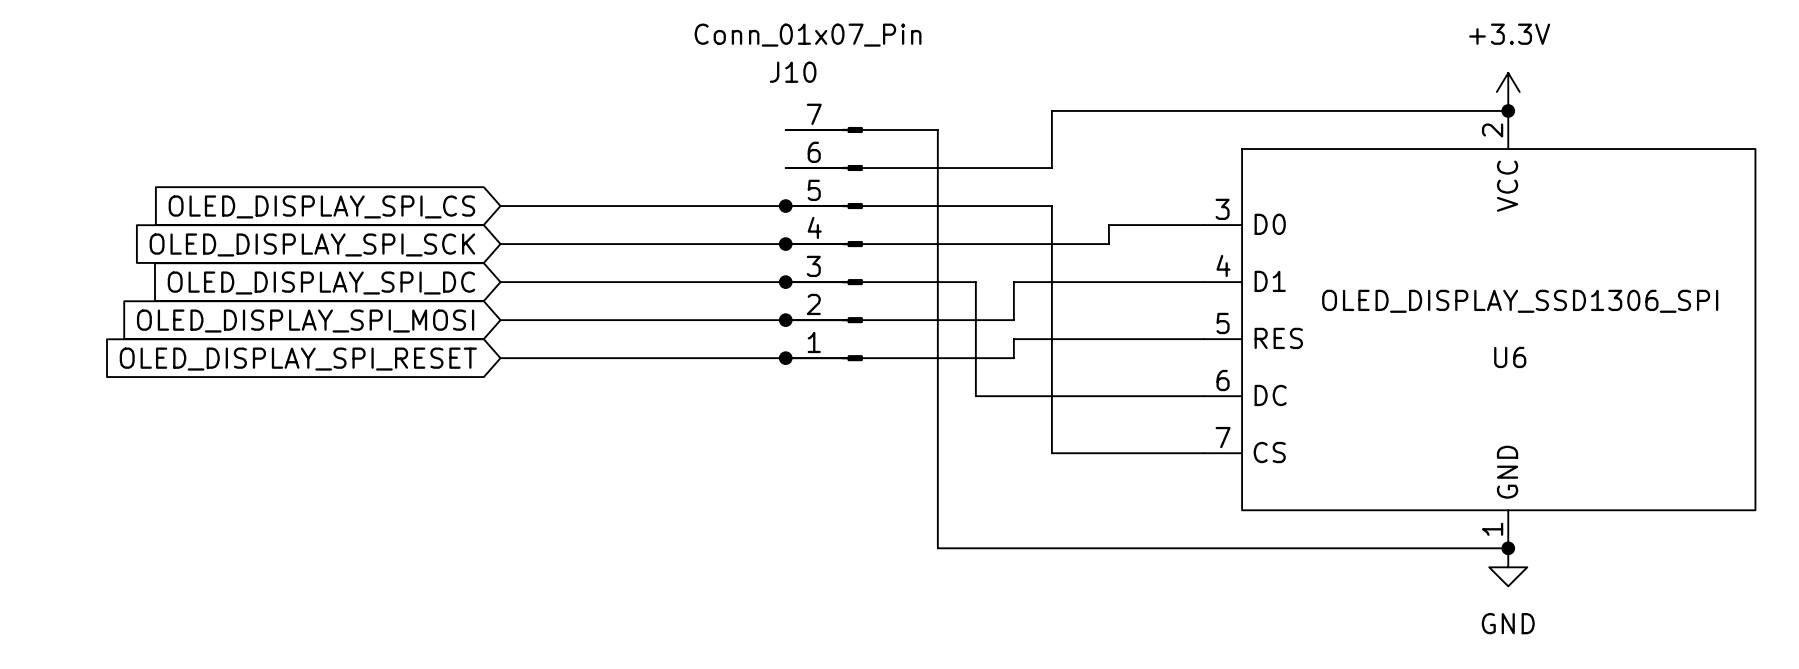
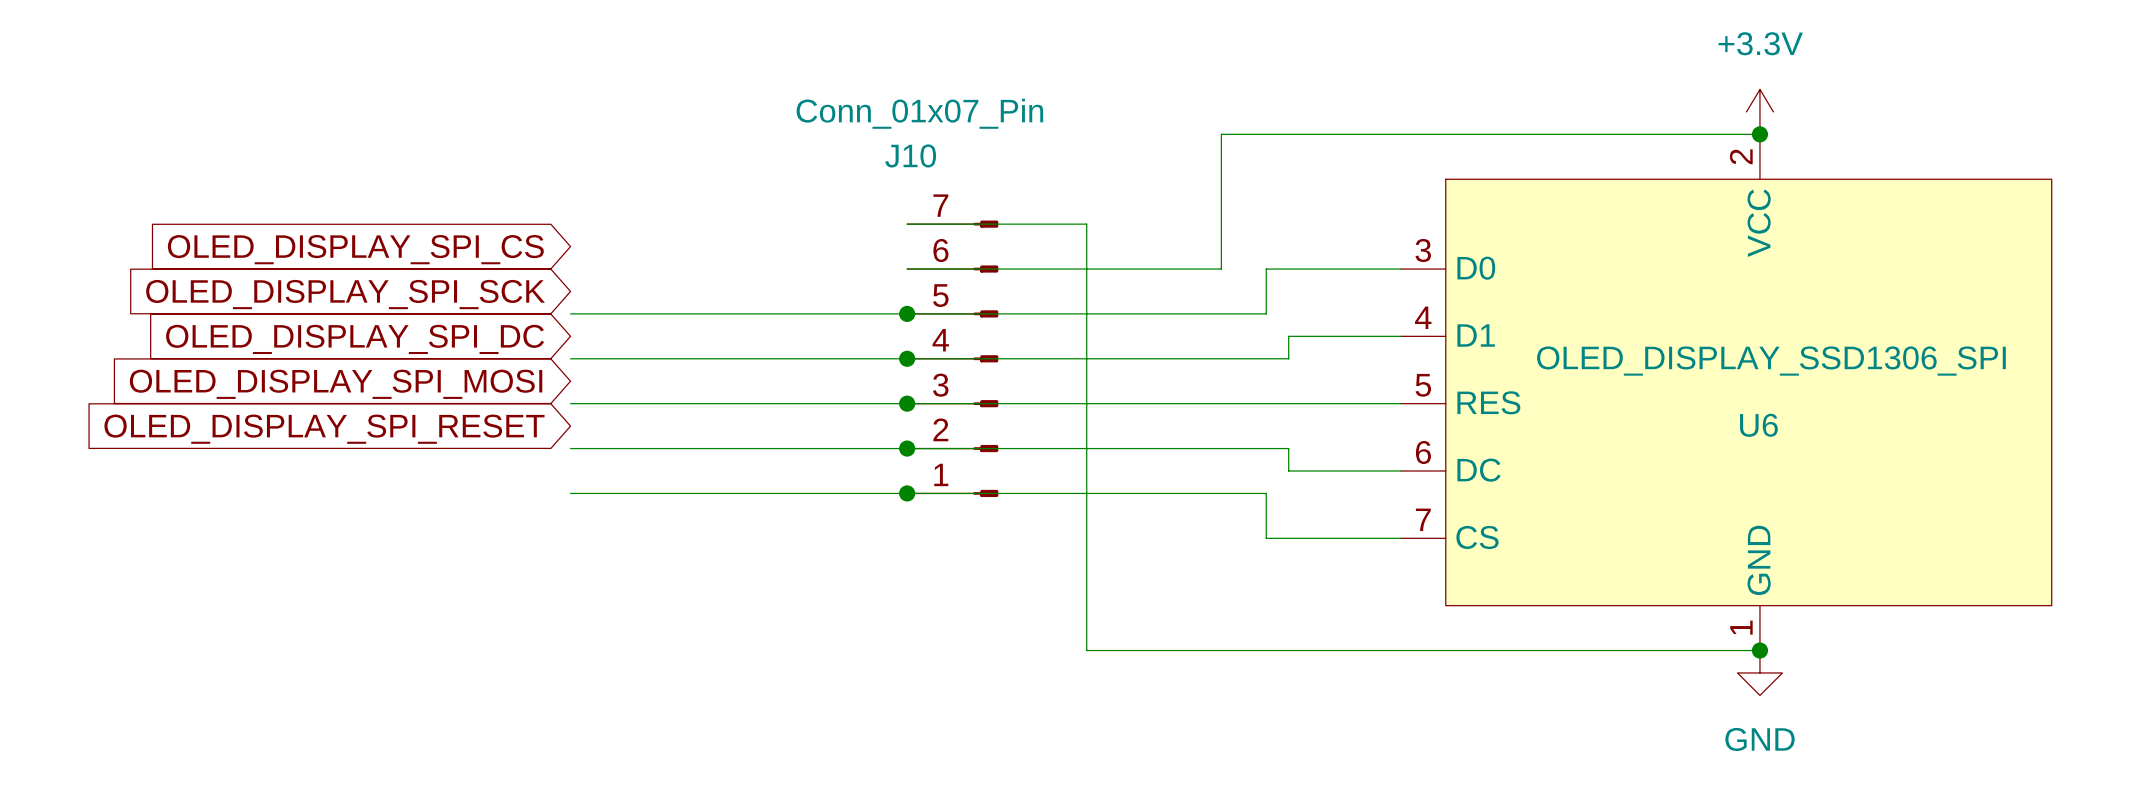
wire: (785, 129) (937, 129) (937, 187) -> (907, 224) (1086, 224)
wire: (785, 168) (1051, 168) -> (1221, 246) (1221, 201)
wire: (500, 206) (1051, 206) -> none
junction: (785, 206) -> none
wire: (1051, 225) (1051, 453) (1089, 453) -> (1221, 269) (907, 269)
wire: (1108, 225) (1108, 244) (500, 244) -> (1288, 269) (1266, 269) (1266, 313) (570, 313)
junction: (785, 244) -> none
J10 position: (824, 244) -> (952, 358)
junction: none -> (907, 313)
wire: (500, 282) (975, 282) (975, 396) (1108, 396) -> (570, 448) (1288, 448) (1288, 471)
junction: (785, 282) -> none
wire: (1108, 282) (1013, 282) (1013, 320) (500, 320) -> (1288, 336) (1288, 358) (570, 358)
junction: none -> (907, 358)
junction: (785, 320) -> none
junction: none -> (907, 403)
wire: (1013, 339) (1013, 358) (500, 358) -> (1176, 403) (570, 403)
junction: (785, 358) -> none
junction: none -> (907, 448)
wire: none -> (570, 493) (1266, 493) (1266, 538)
junction: none -> (907, 493)

